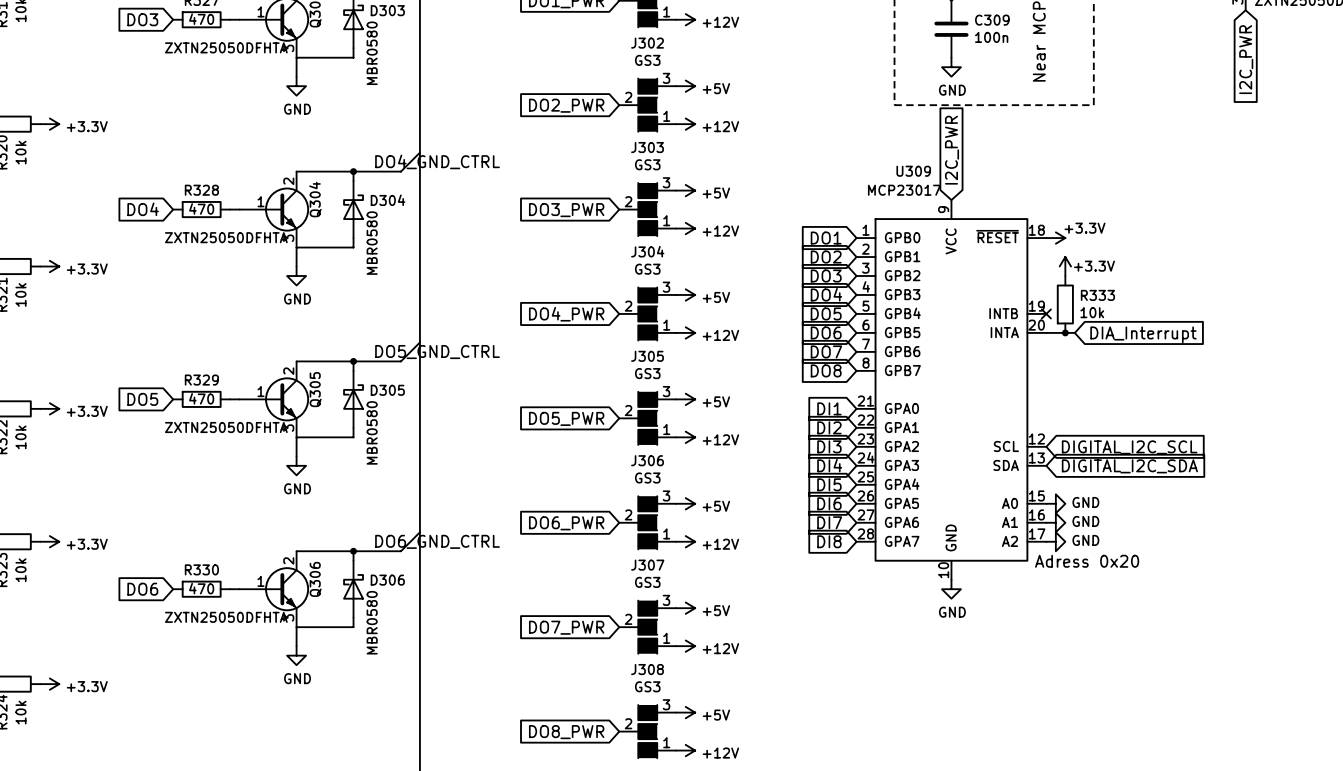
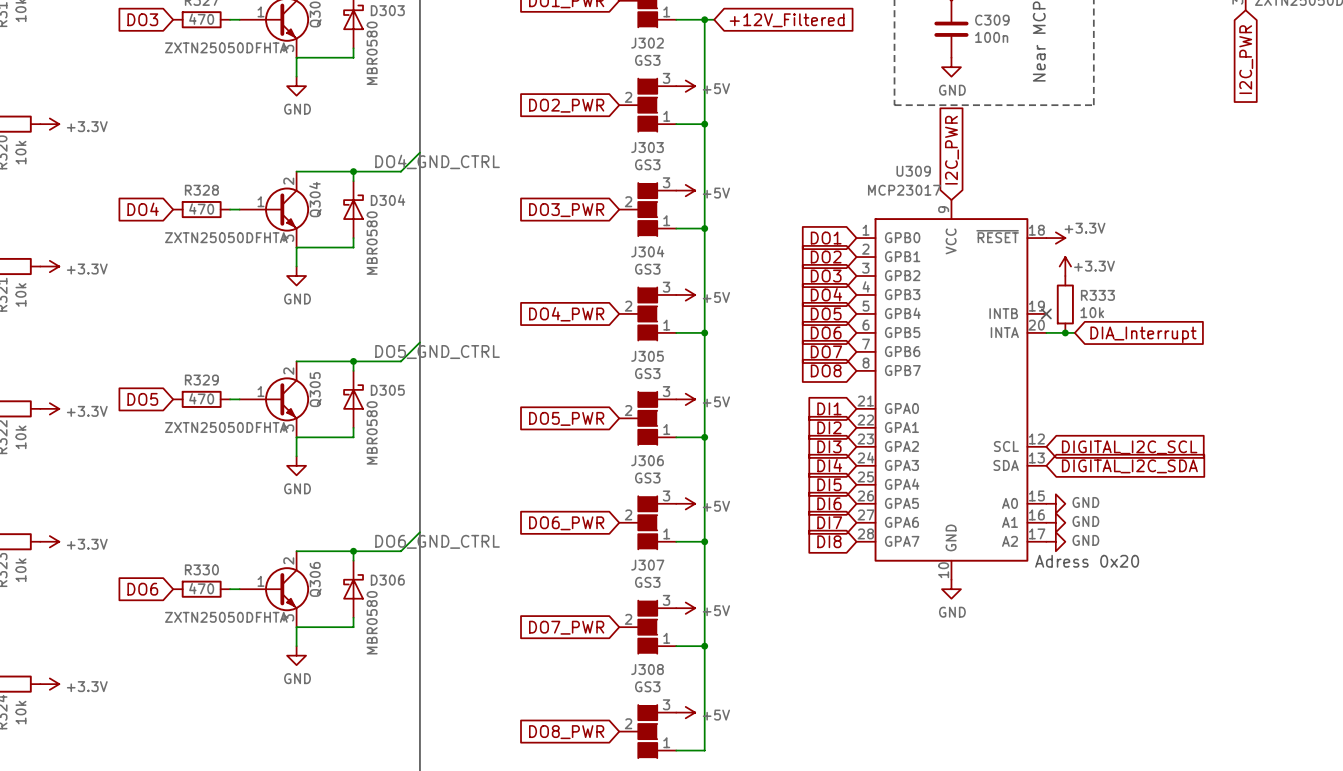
power symbol: +12V (685, 19) -> none
wire: none -> (704, 19) (704, 750) (676, 750)
junction: none -> (704, 19)
global label: none -> +12V_Filtered (787, 20)
power symbol: +12V (685, 124) -> none
junction: none -> (704, 124)
power symbol: +12V (685, 228) -> none
junction: none -> (704, 228)
power symbol: +12V (685, 332) -> none
junction: none -> (704, 332)
power symbol: +12V (685, 437) -> none
junction: none -> (704, 437)
power symbol: +12V (685, 541) -> none
junction: none -> (704, 541)
power symbol: +12V (685, 646) -> none
junction: none -> (704, 646)
power symbol: +12V (685, 750) -> none

